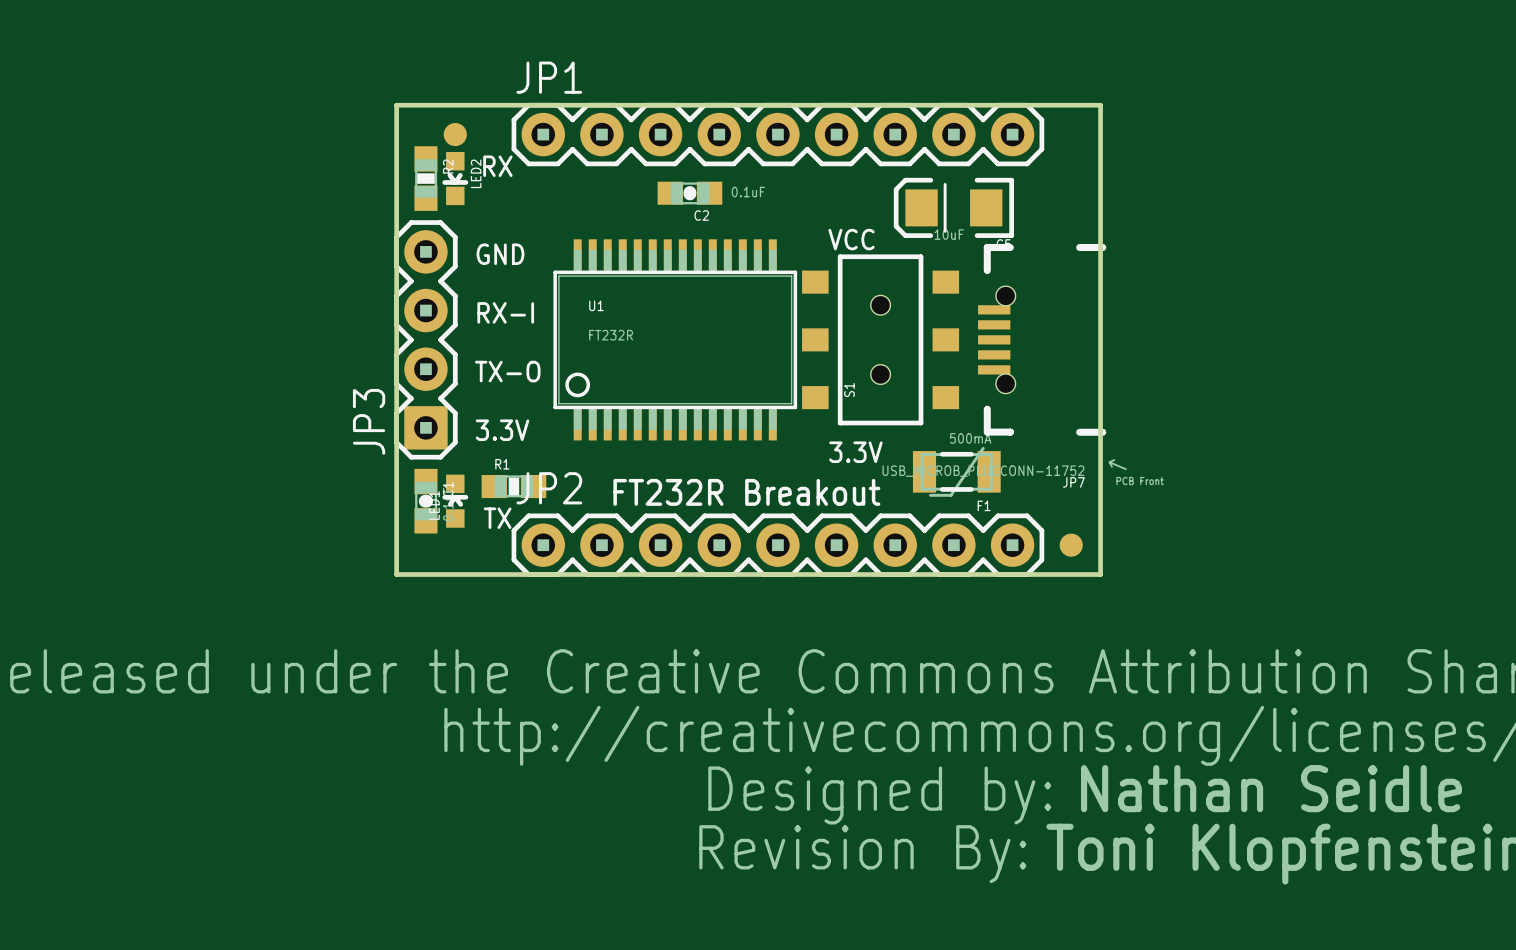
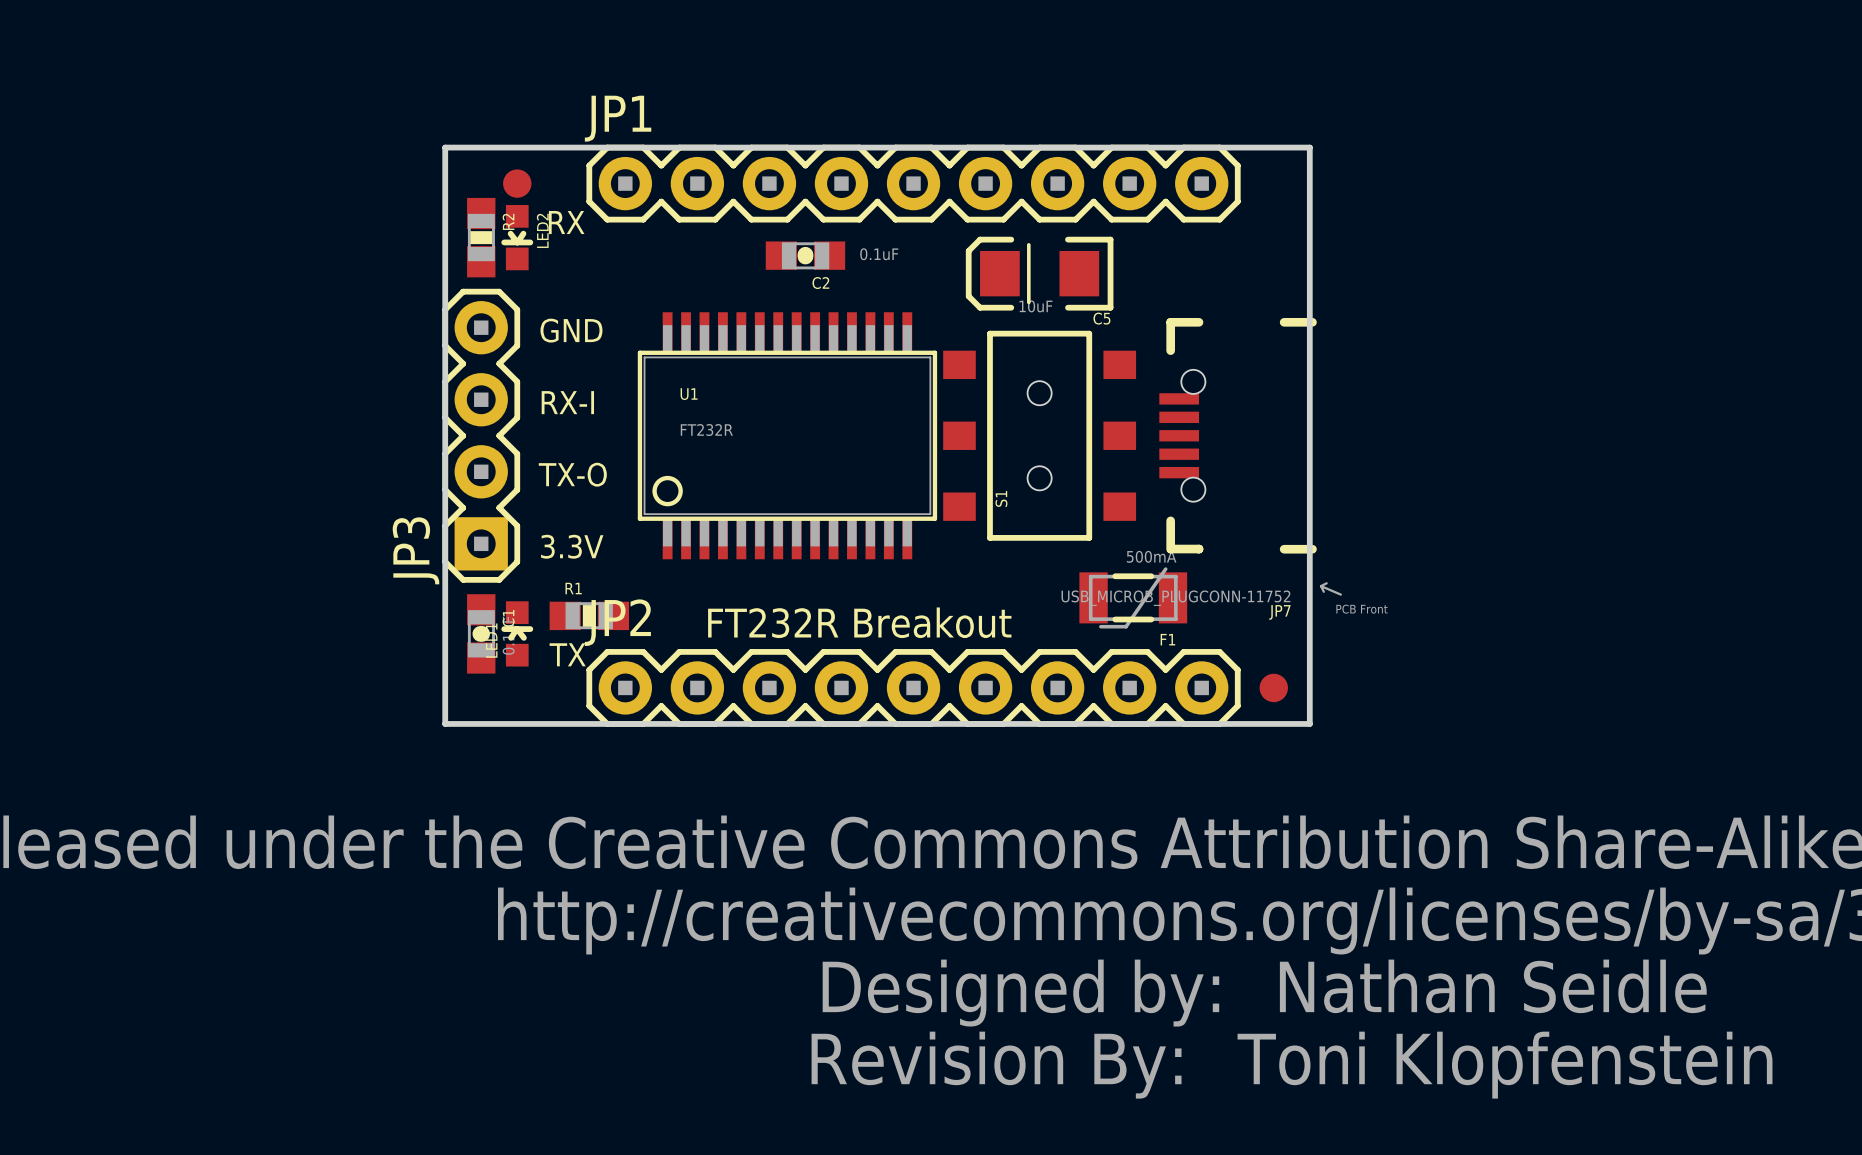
C5 position: (953, 207) -> (1039, 273)
text: VCC (851, 239) -> none
text: 3.3V (855, 452) -> none

